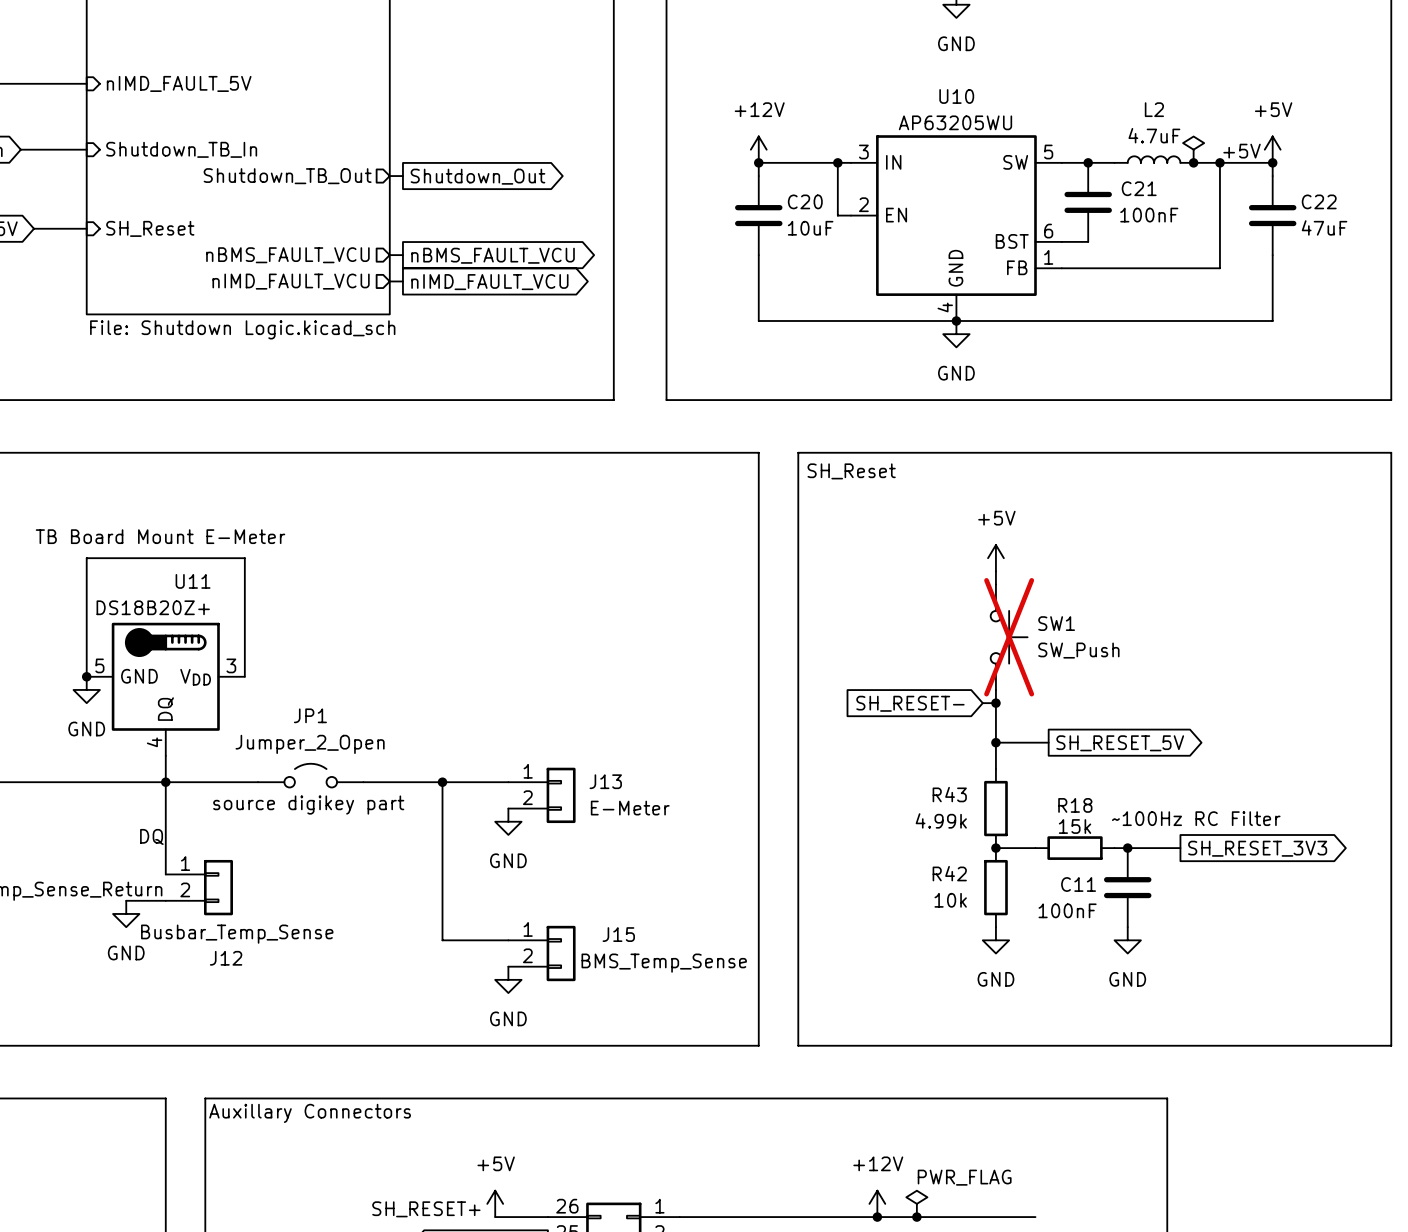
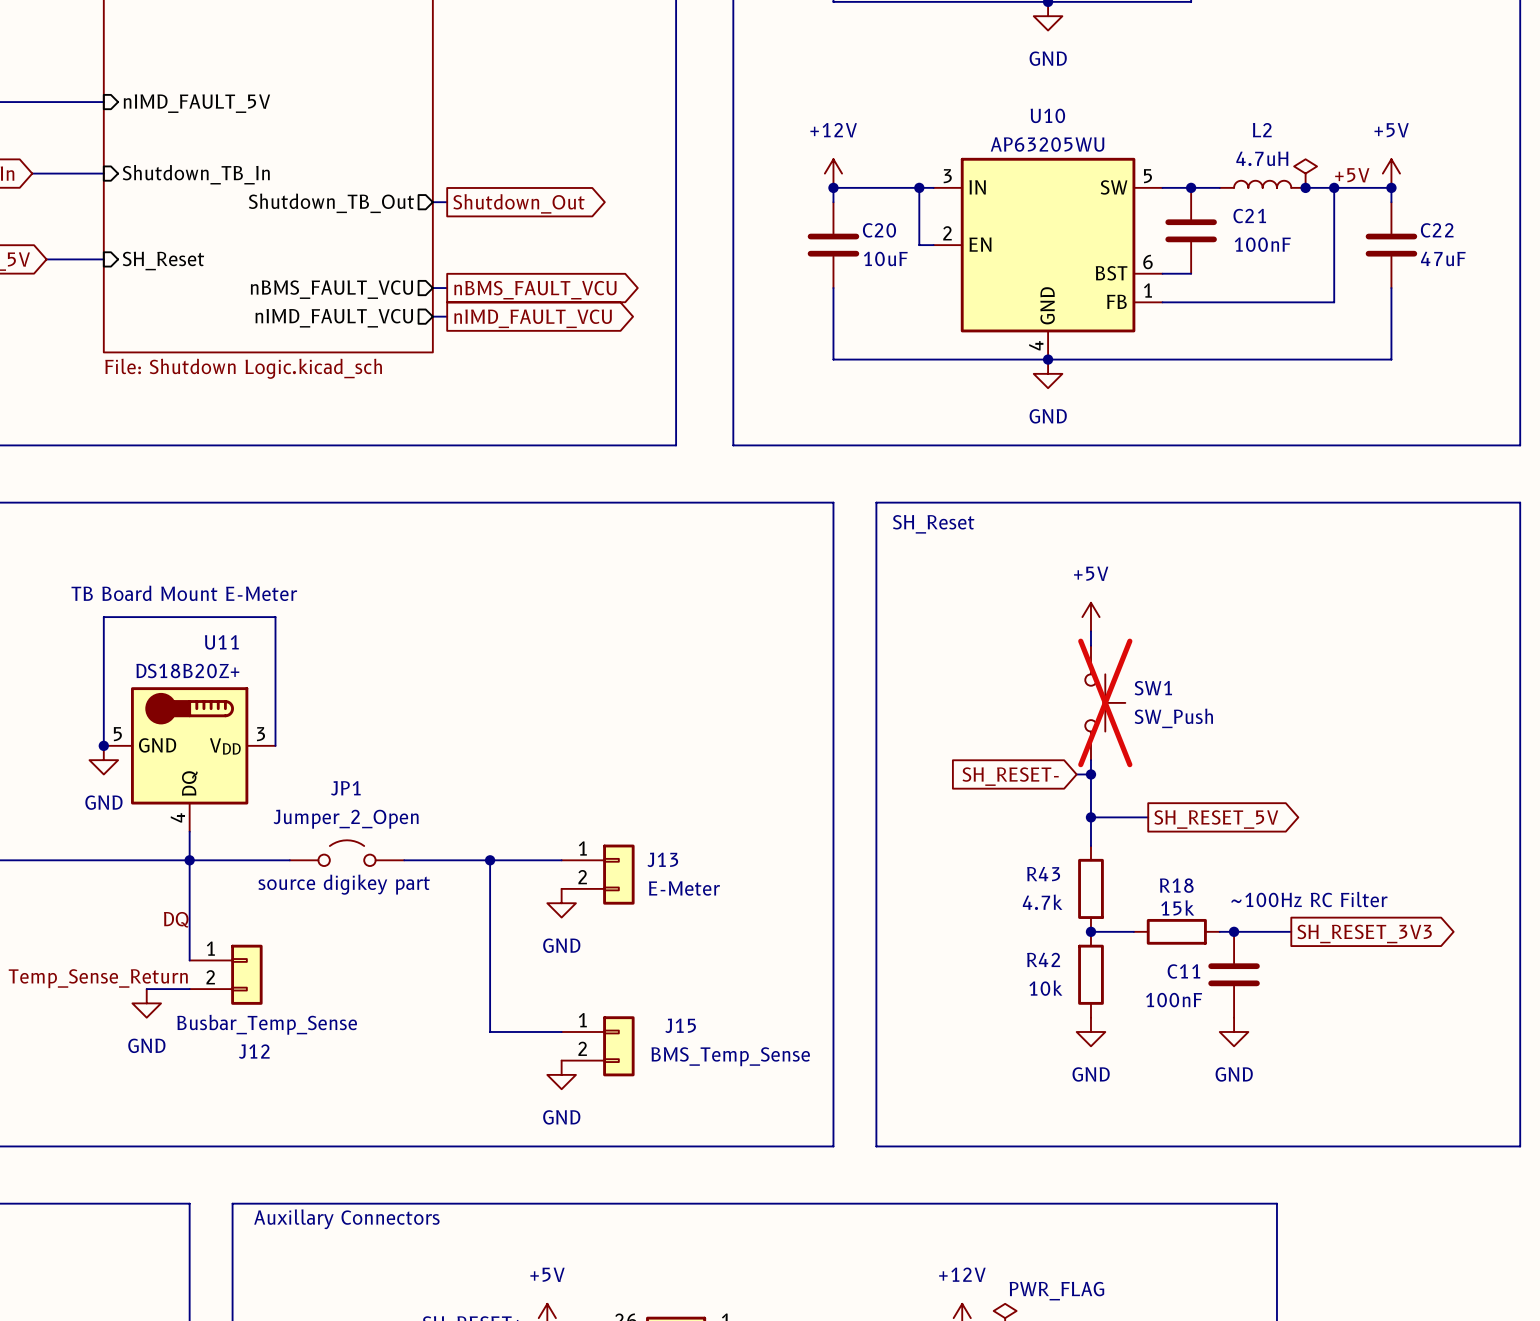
L2 value: 4.7uF (1154, 135) -> 4.7uH (1262, 158)
R43 value: 4.99k (941, 820) -> 4.7k (1042, 902)

